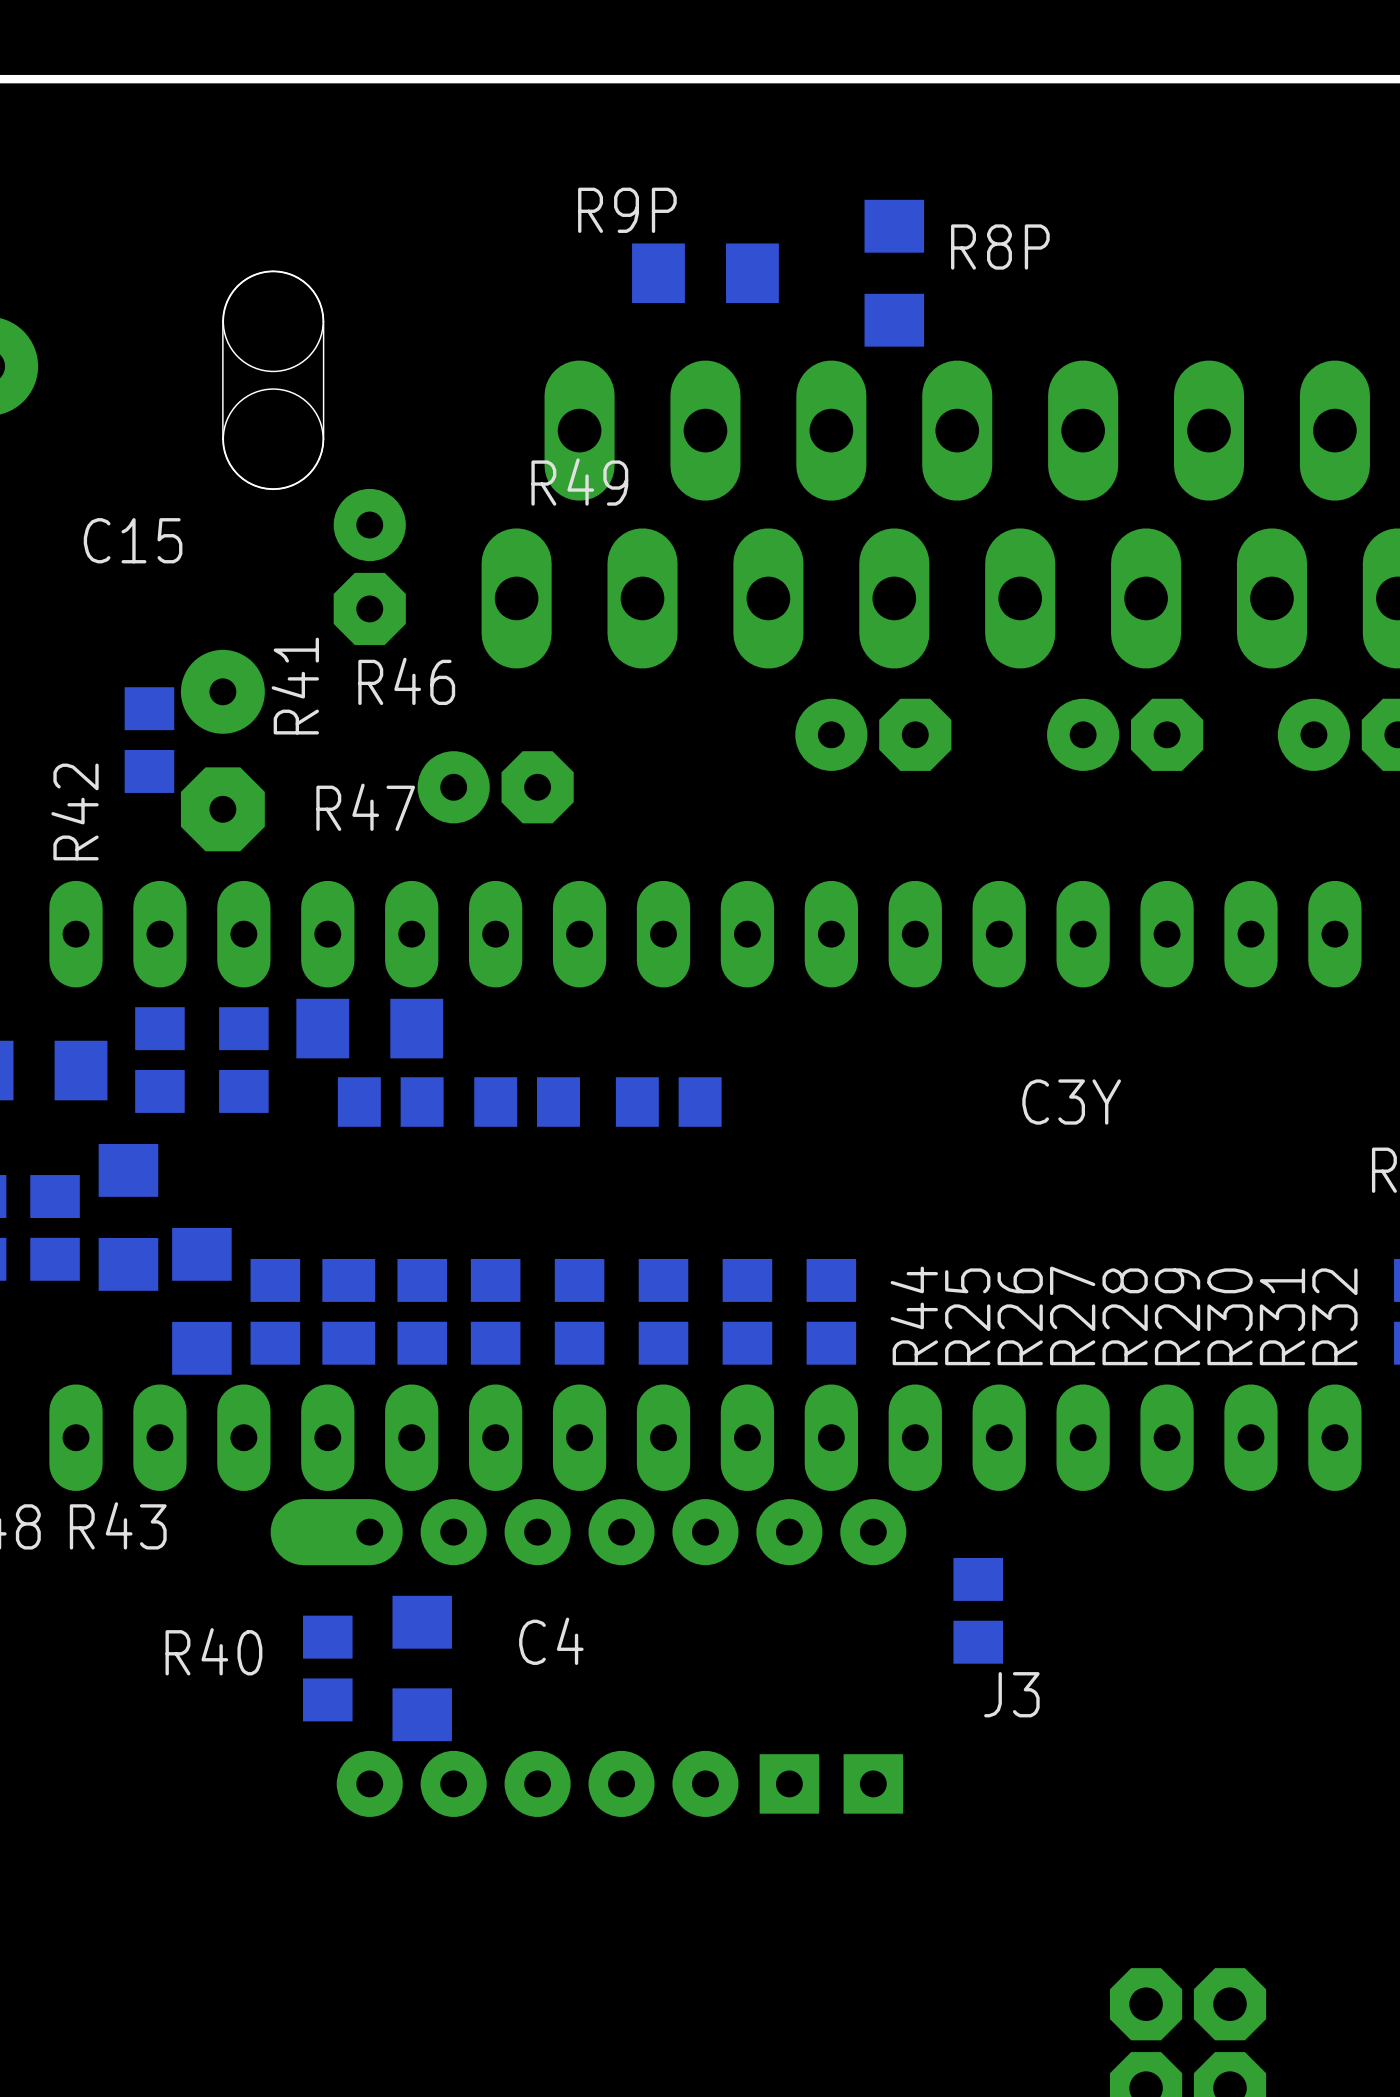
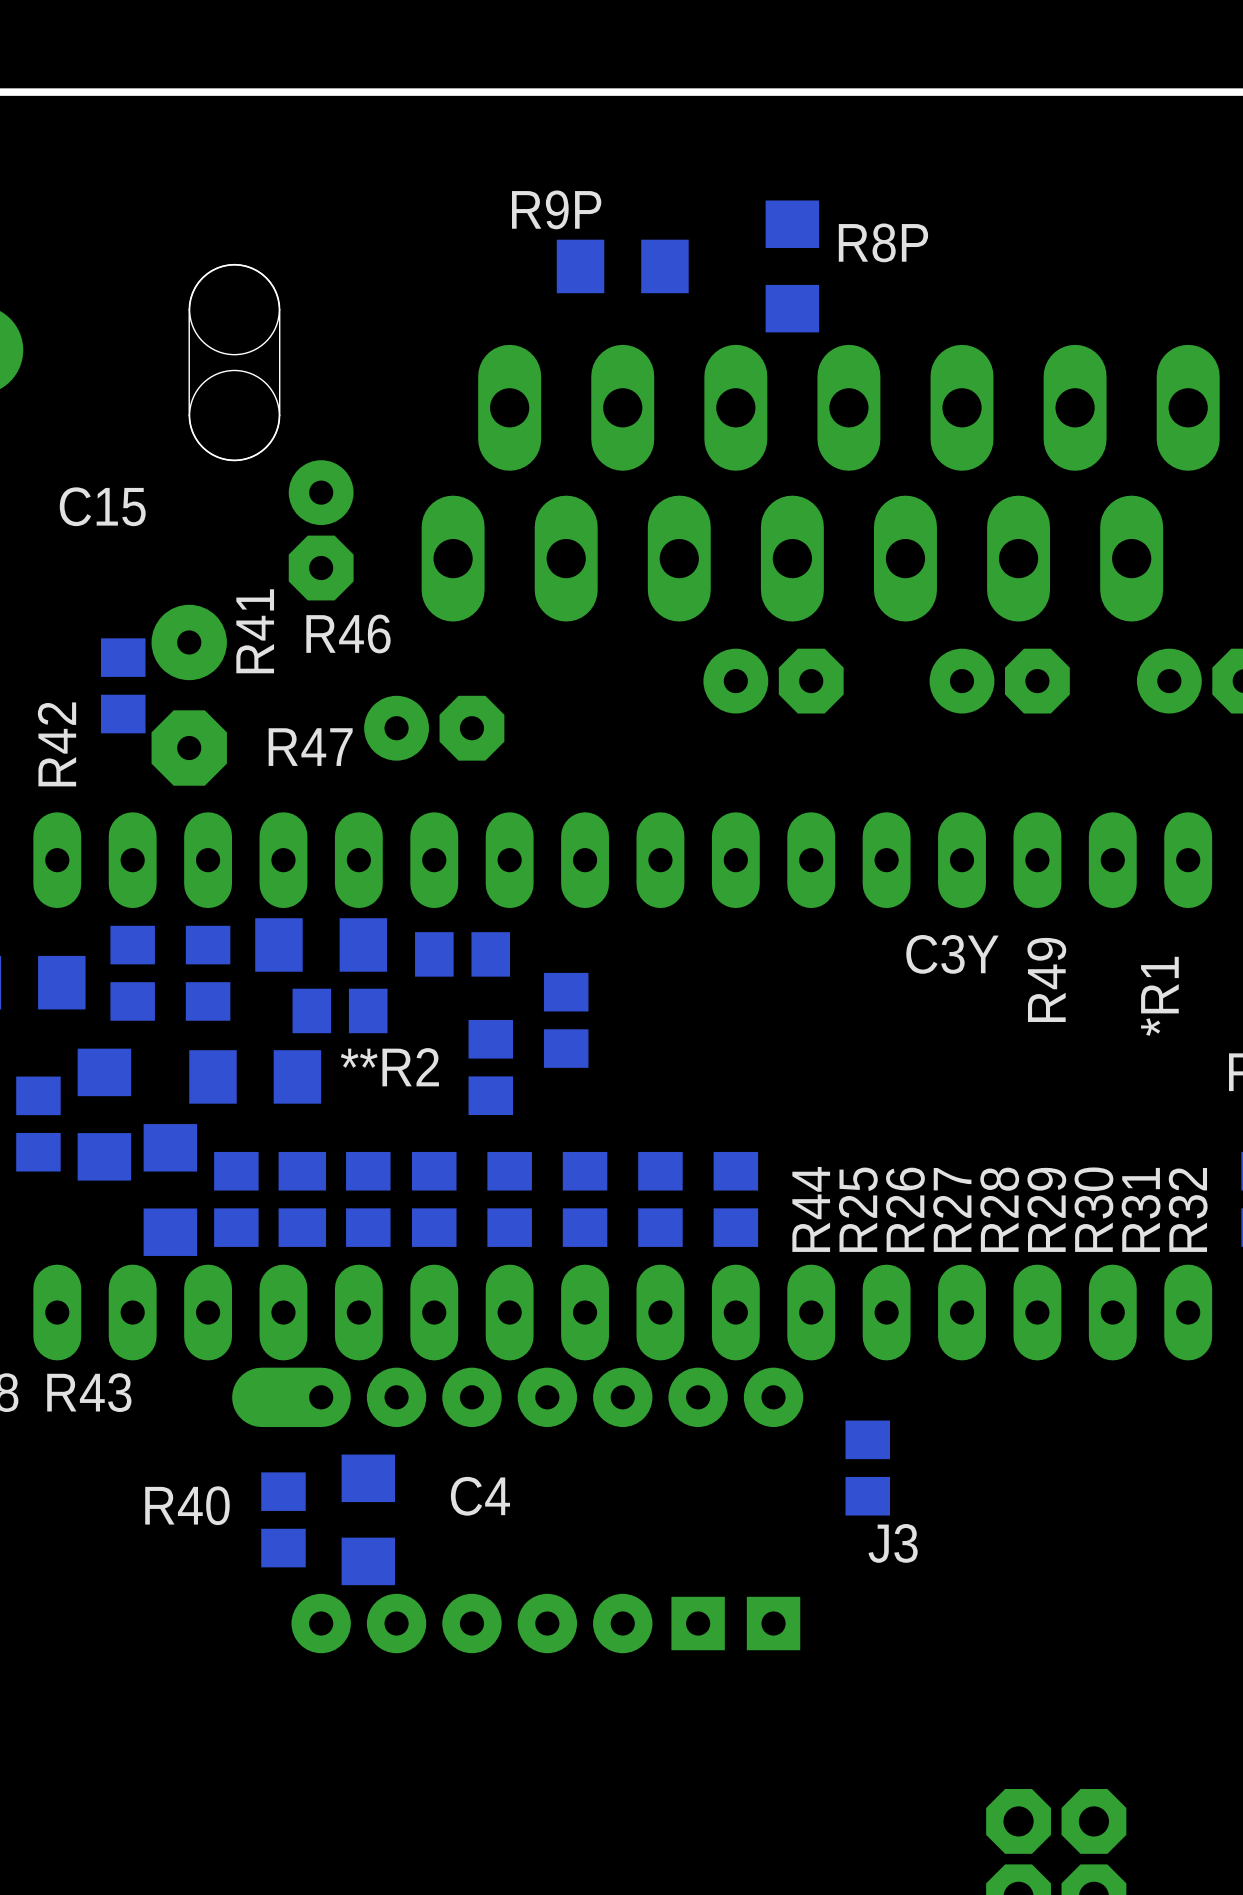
C3Y position: (527, 1102) -> (462, 954)
R49 rotation: 0° (668, 1102) -> 90° clockwise (490, 1067)
R49 position: (668, 1102) -> (490, 1067)
*R1: none -> (566, 1020)
**R2: none -> (255, 1076)

